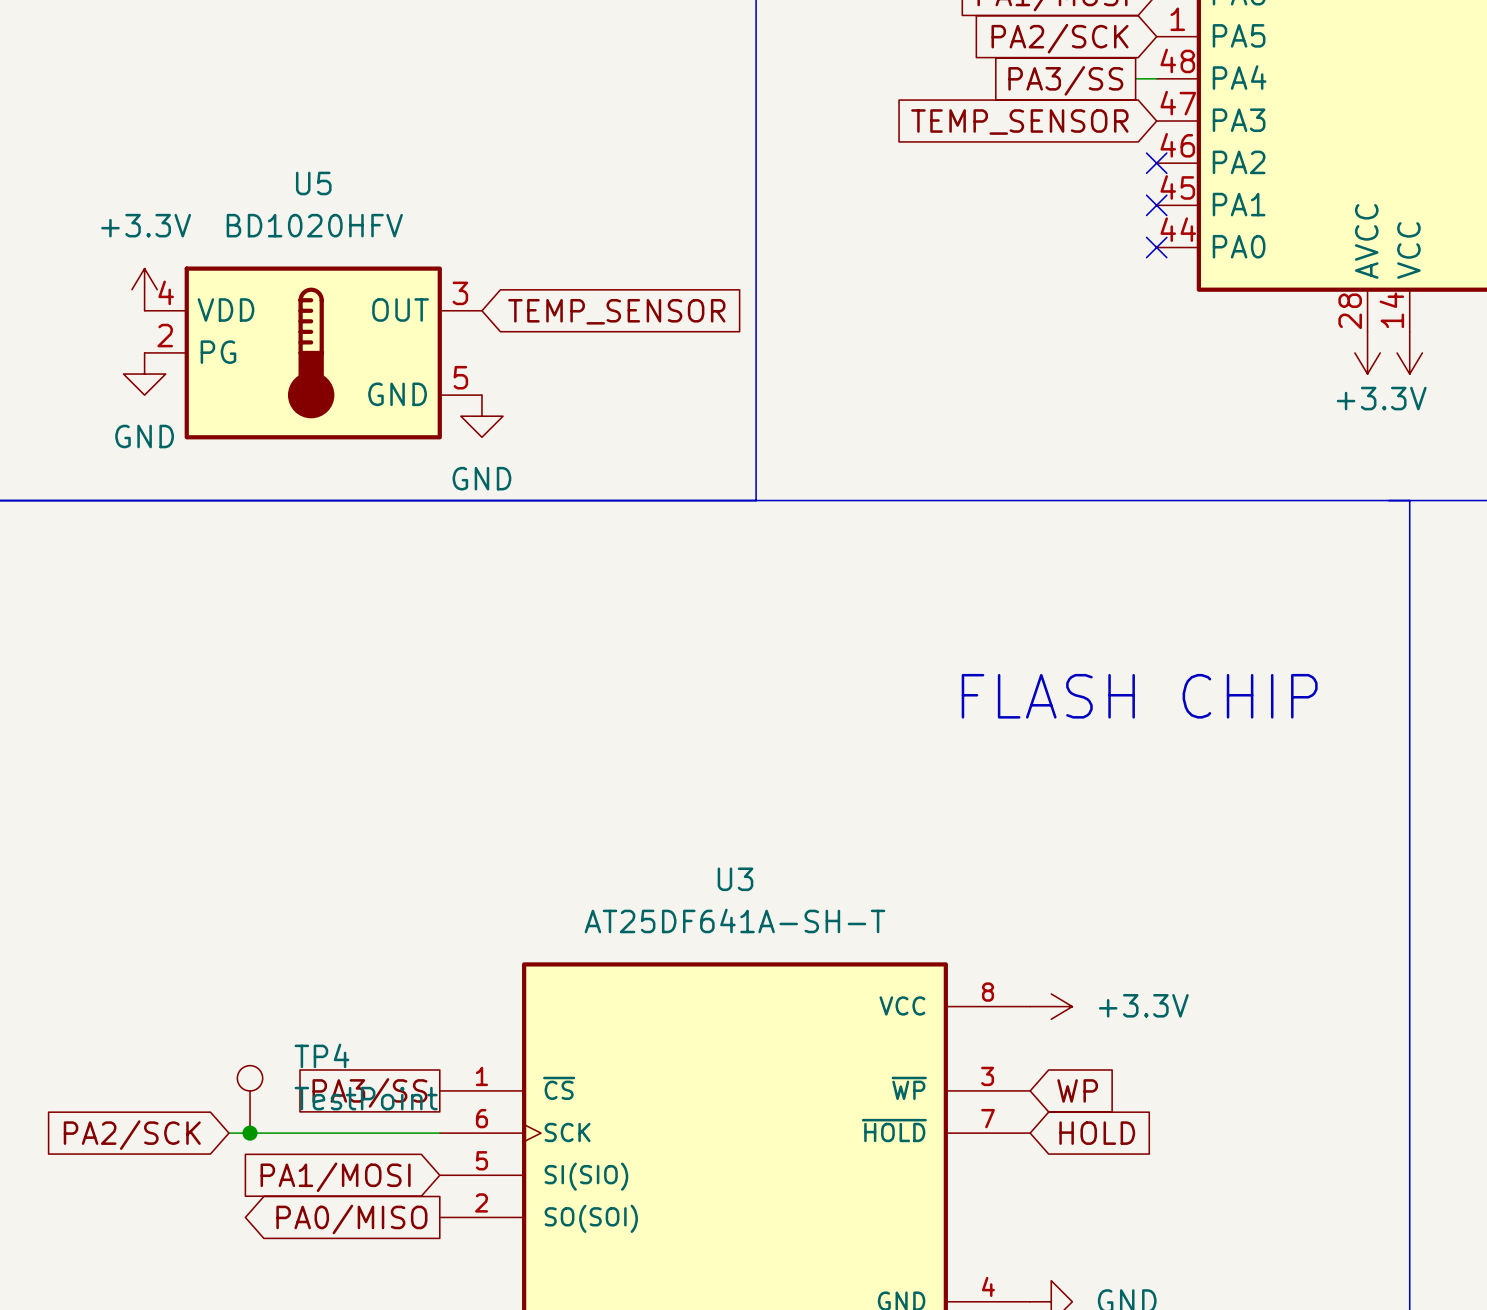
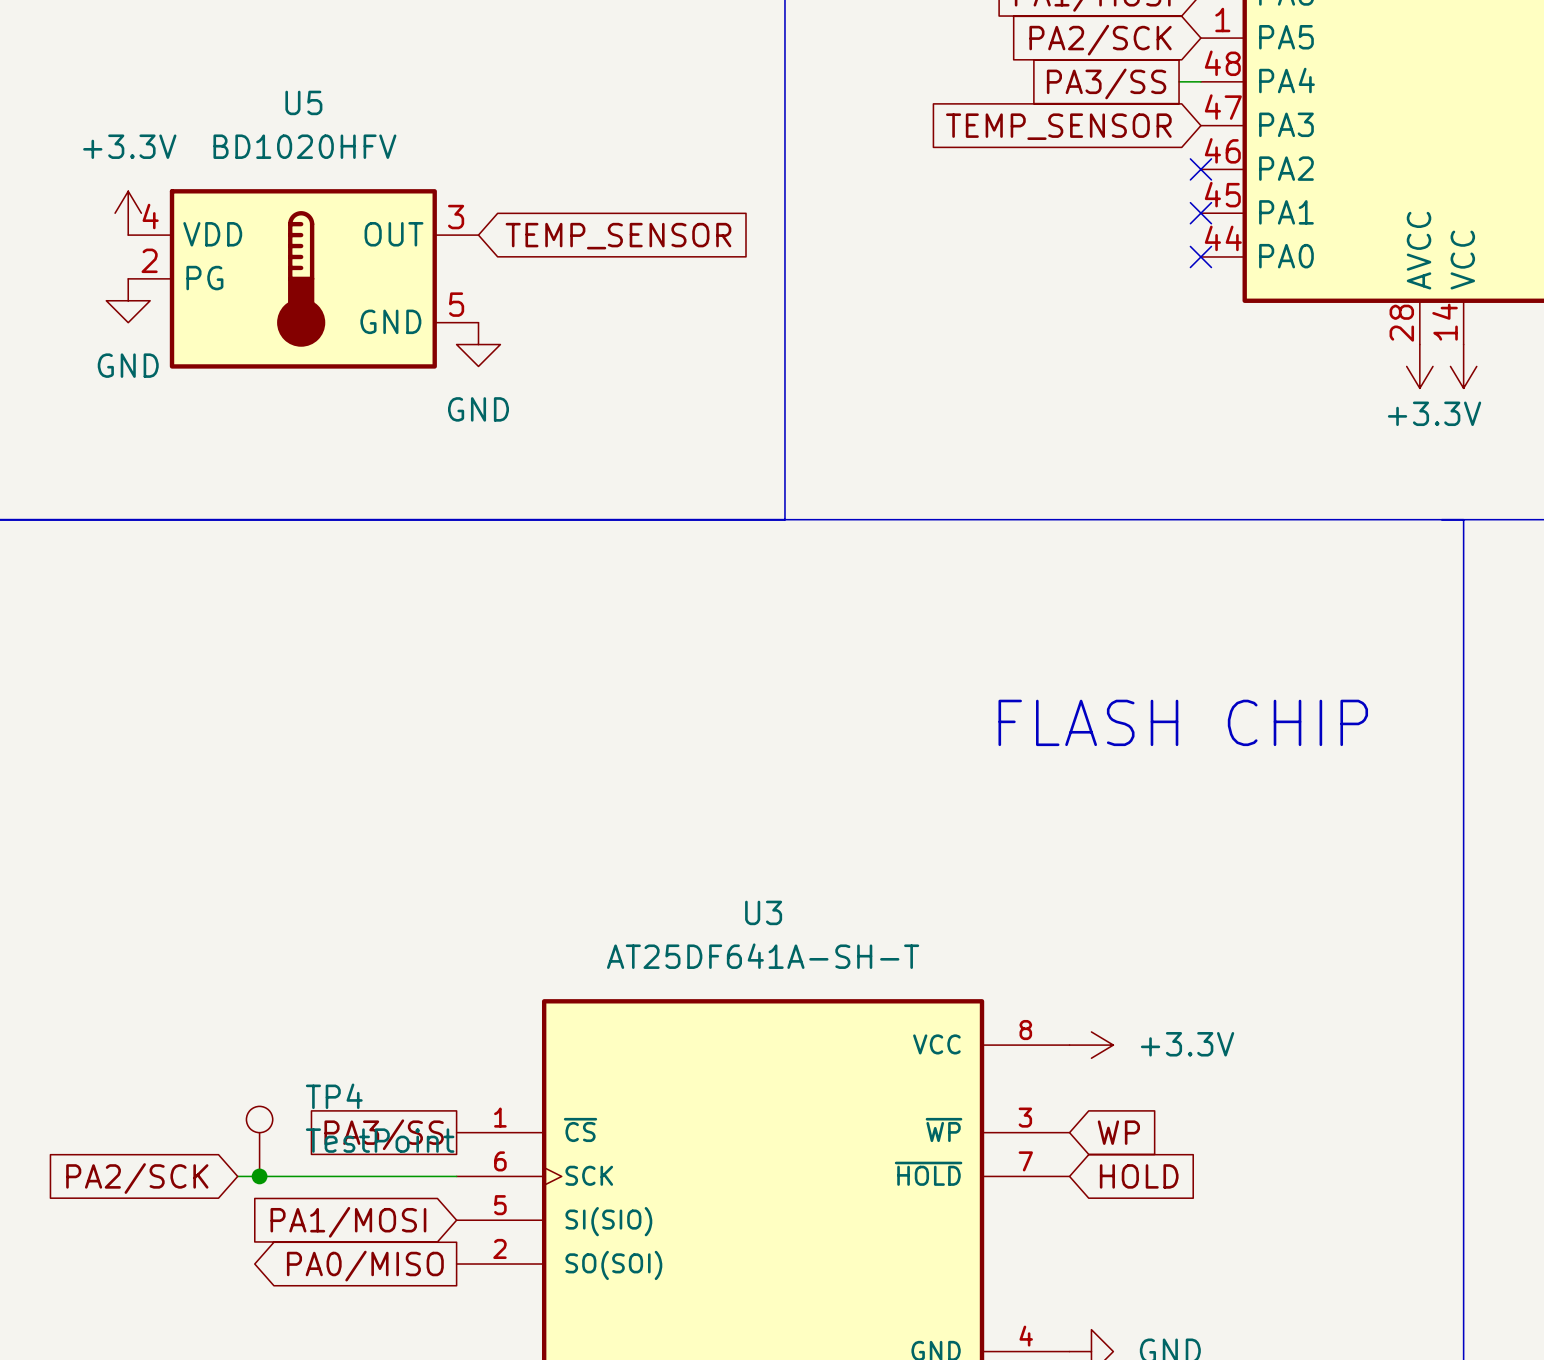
power symbol position: +3.3V (144, 289) -> +3.3V (128, 213)
global label position: TEMP_SENSOR (616, 311) -> TEMP_SENSOR (618, 236)
U5 position: (313, 352) -> (303, 278)
power symbol position: GND (144, 374) -> GND (128, 300)
power symbol position: GND (481, 416) -> GND (478, 344)

